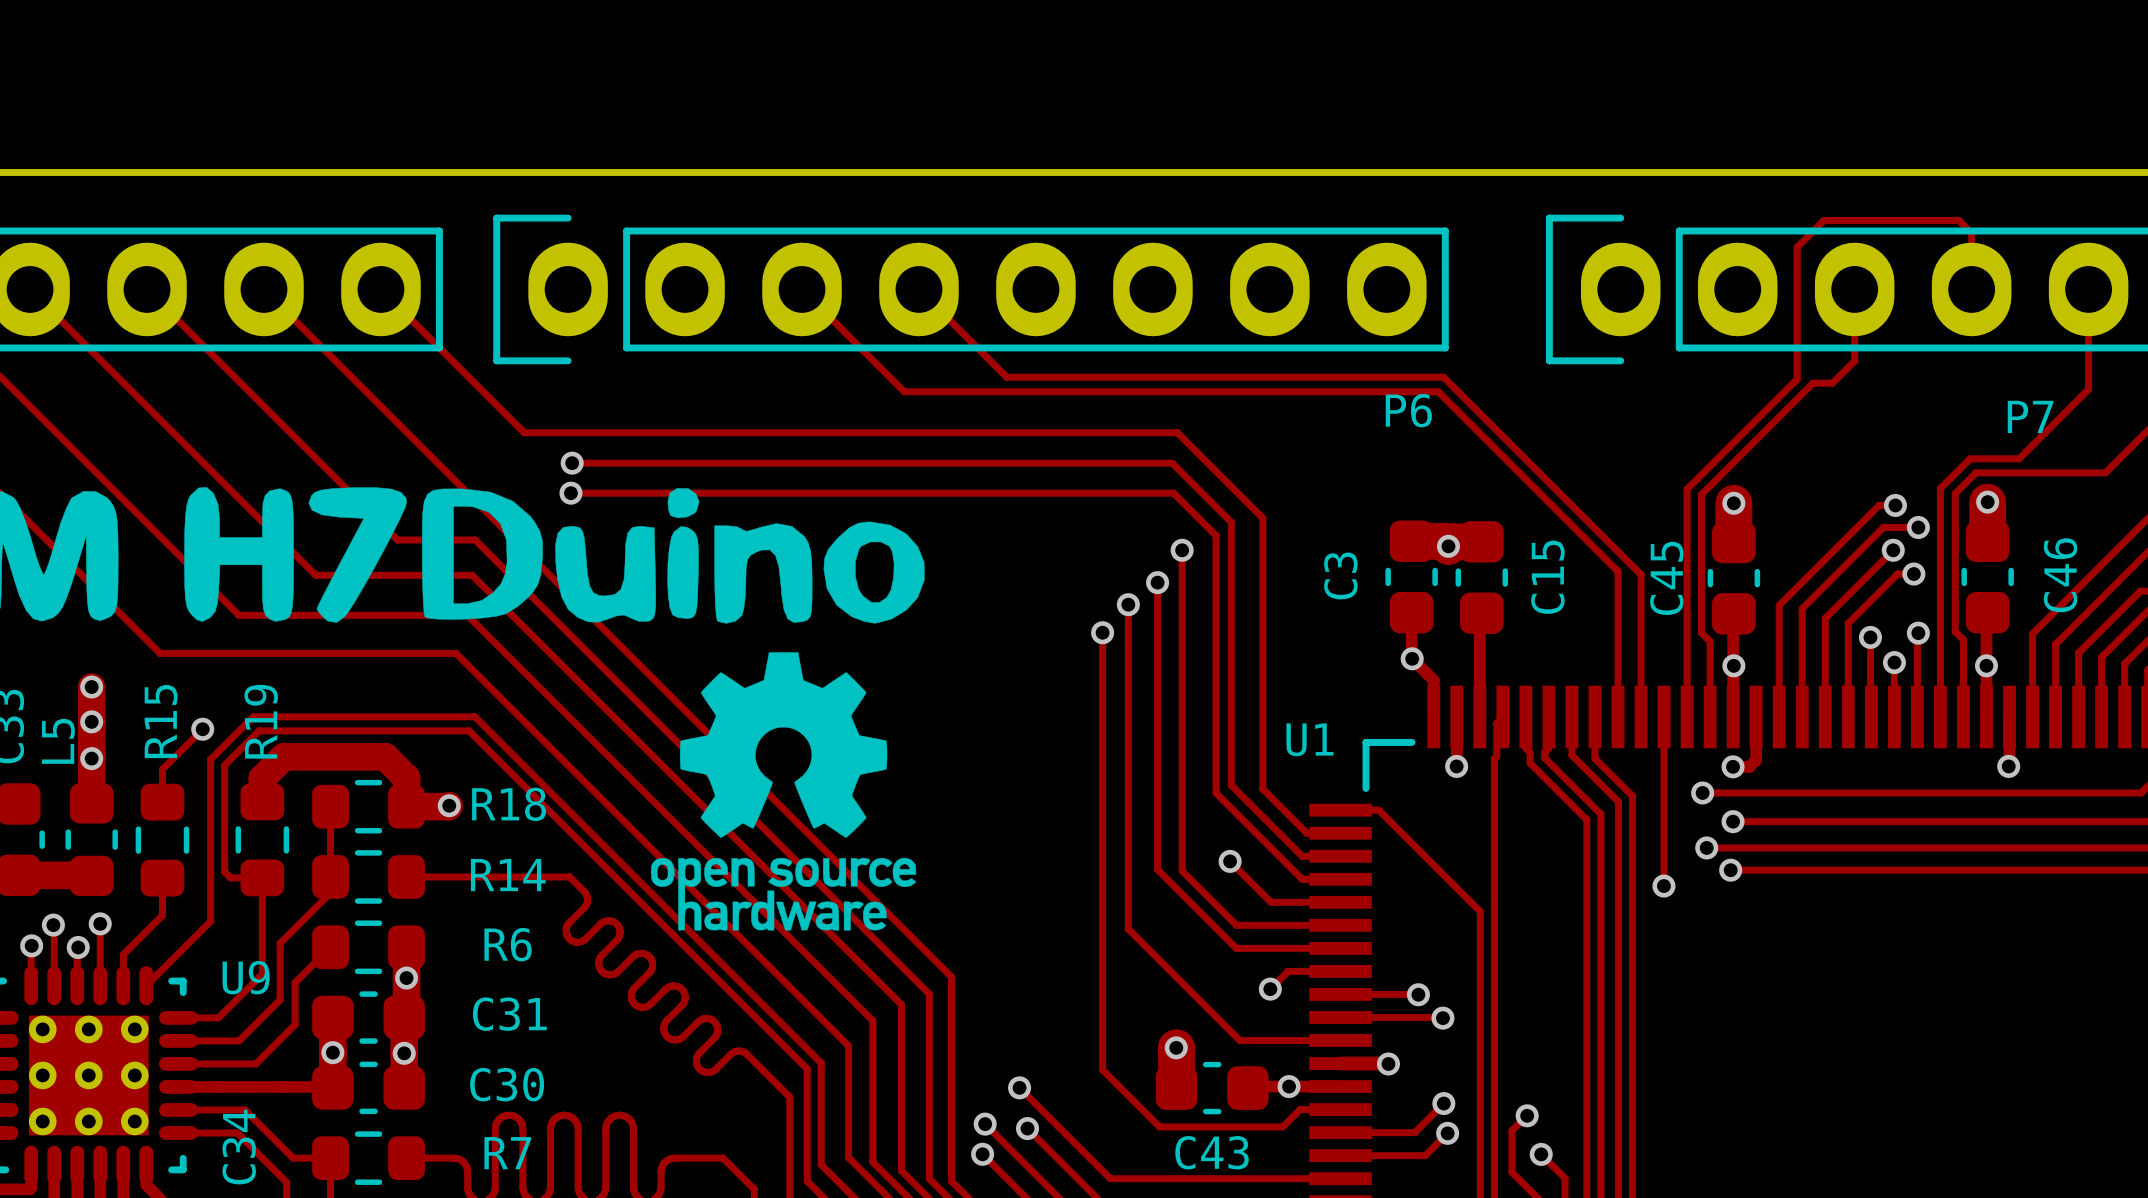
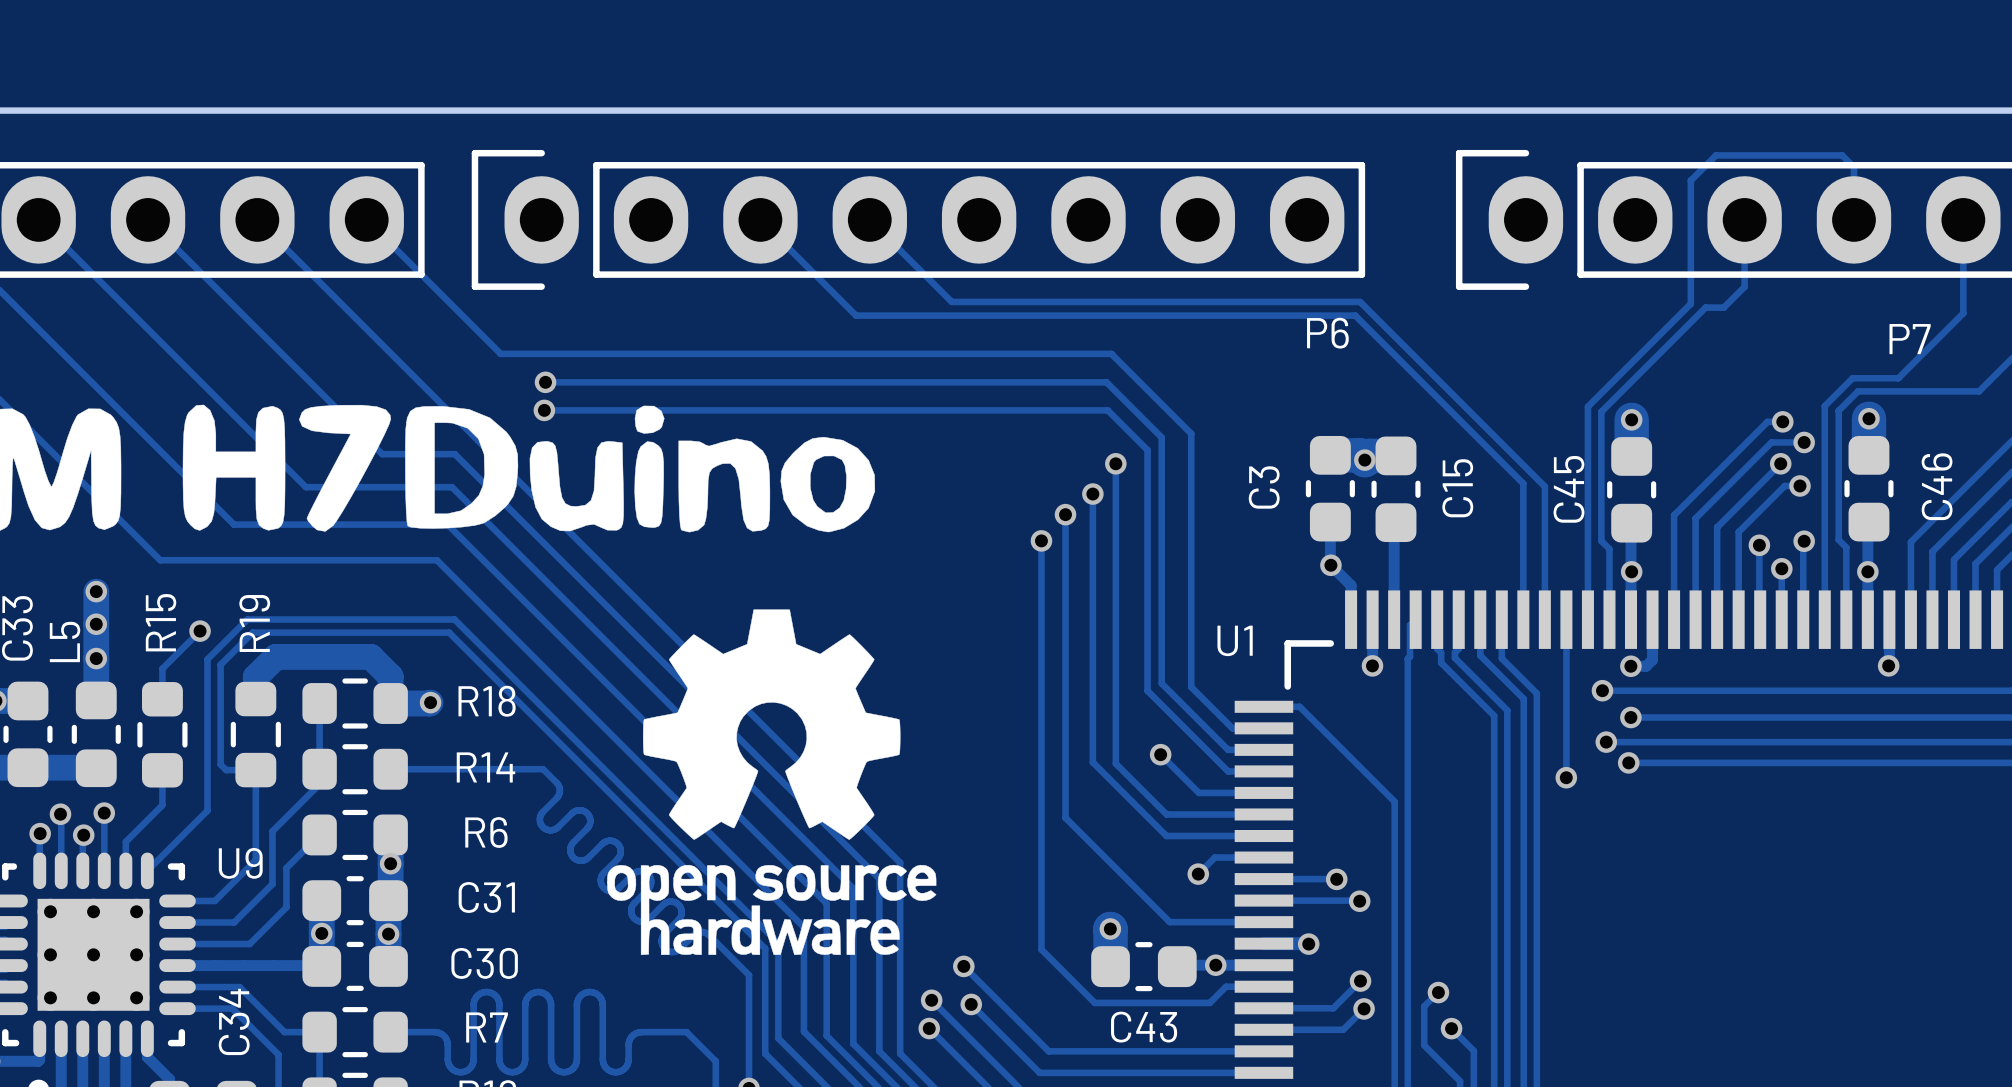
drawing: [651, 652, 917, 931] -> none
drawing: none -> [607, 609, 937, 955]

